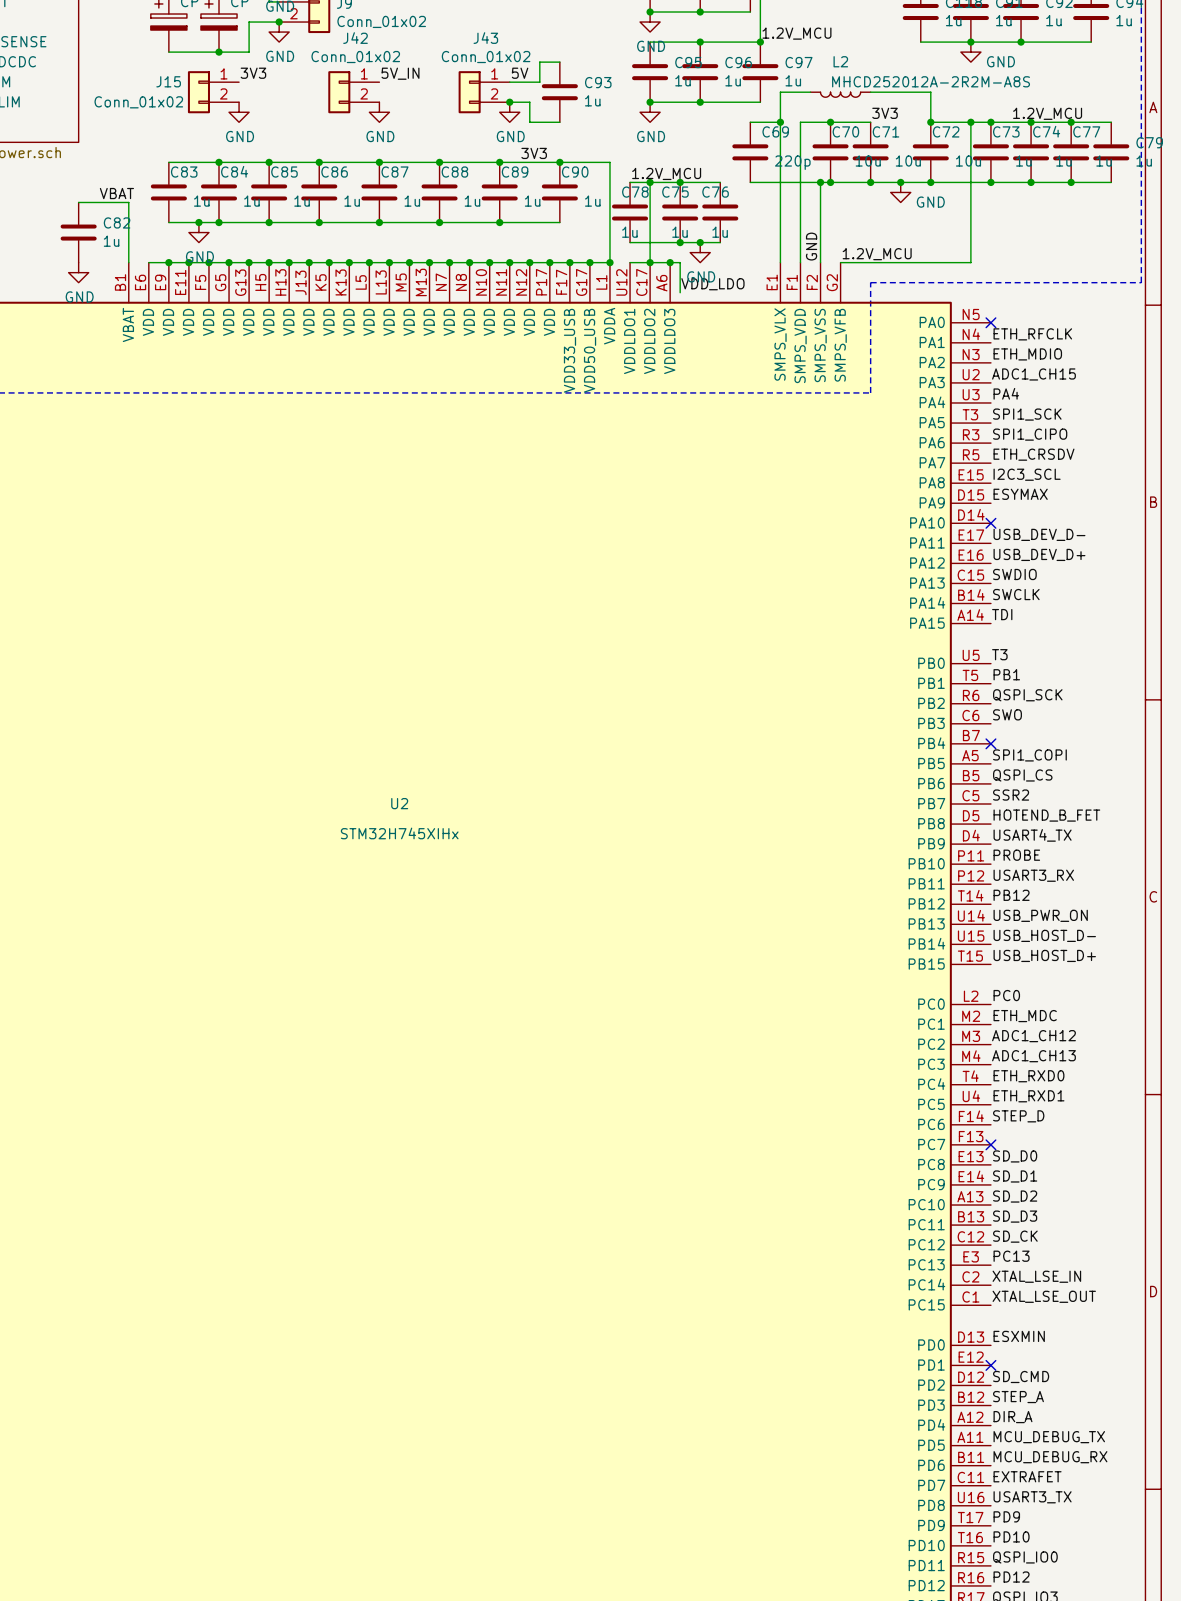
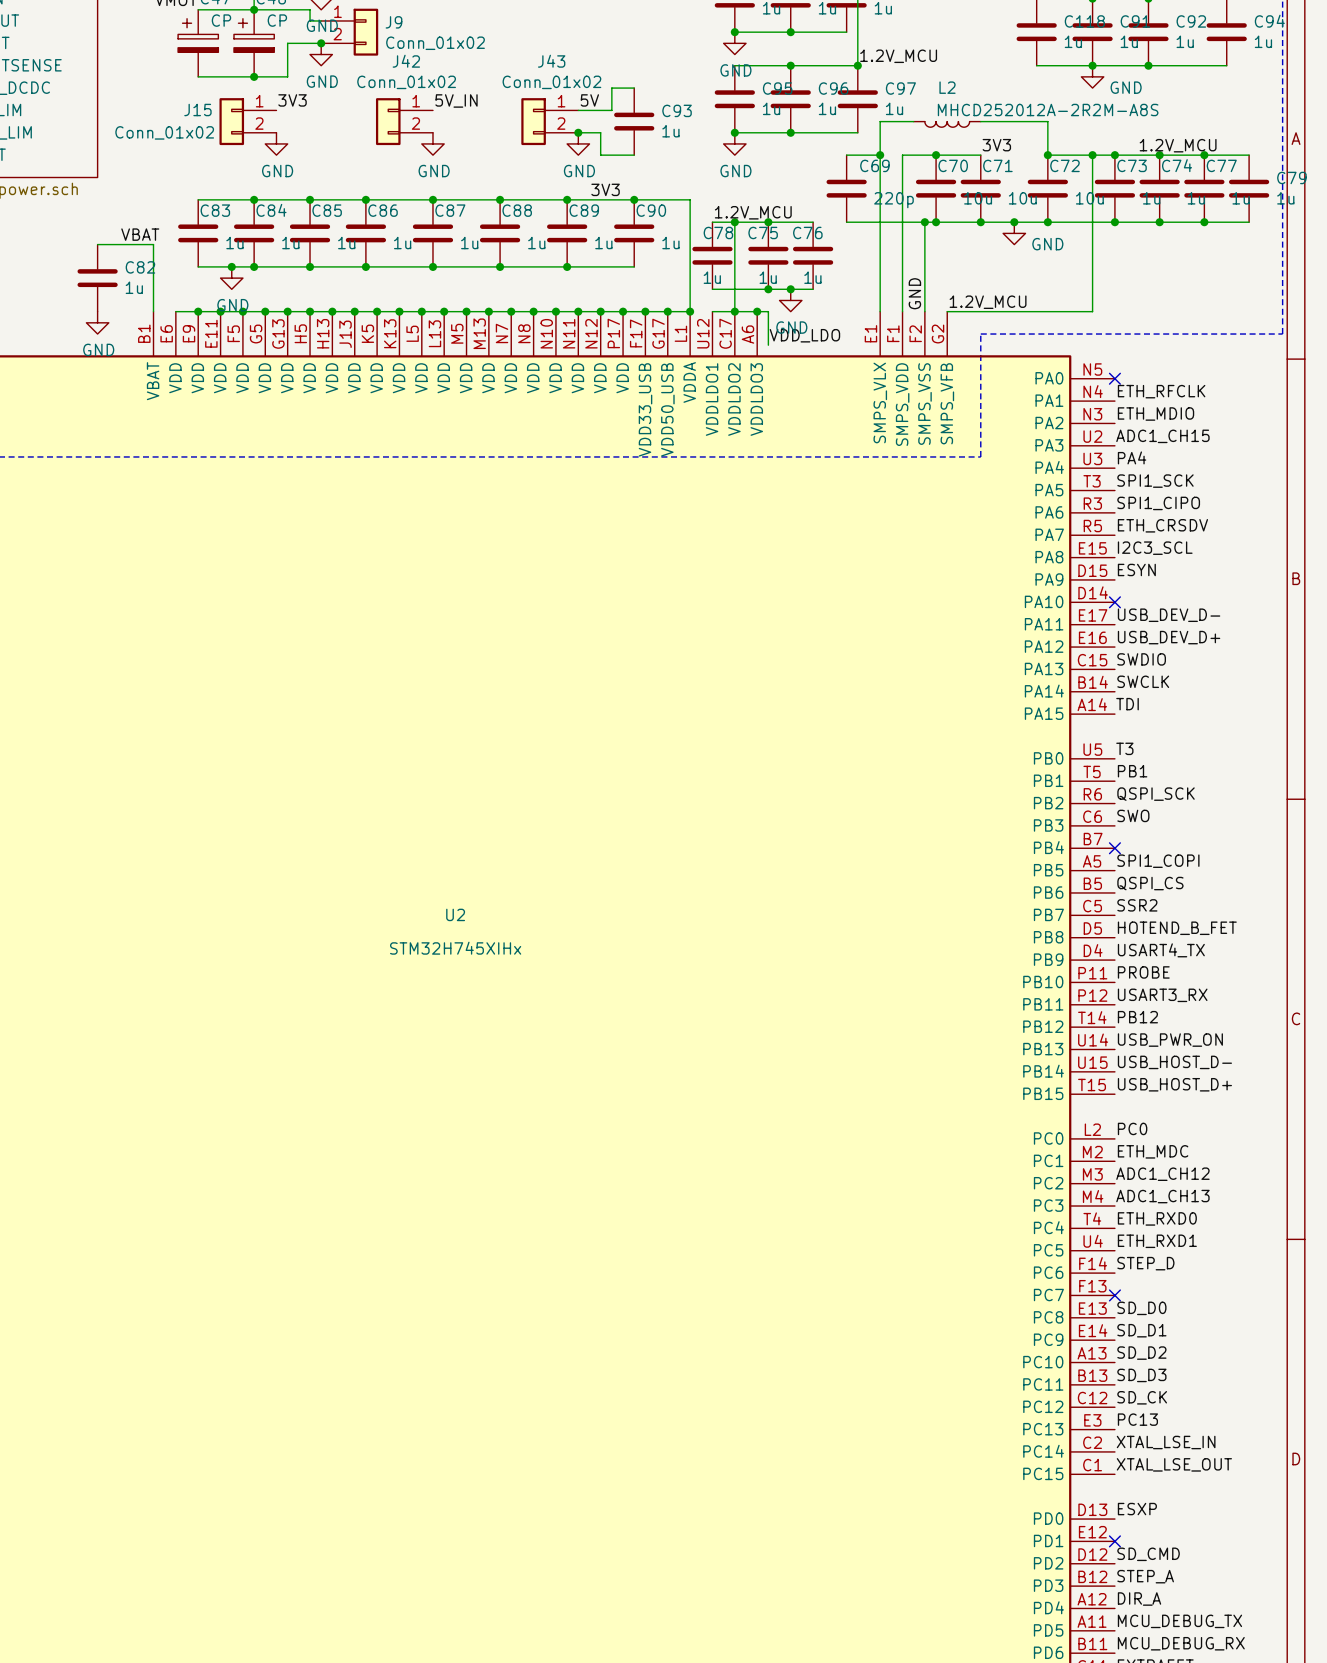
label: ESYMAX (1020, 494) -> ESYN (1136, 569)
label: ESXMIN (1019, 1336) -> ESXP (1137, 1509)

